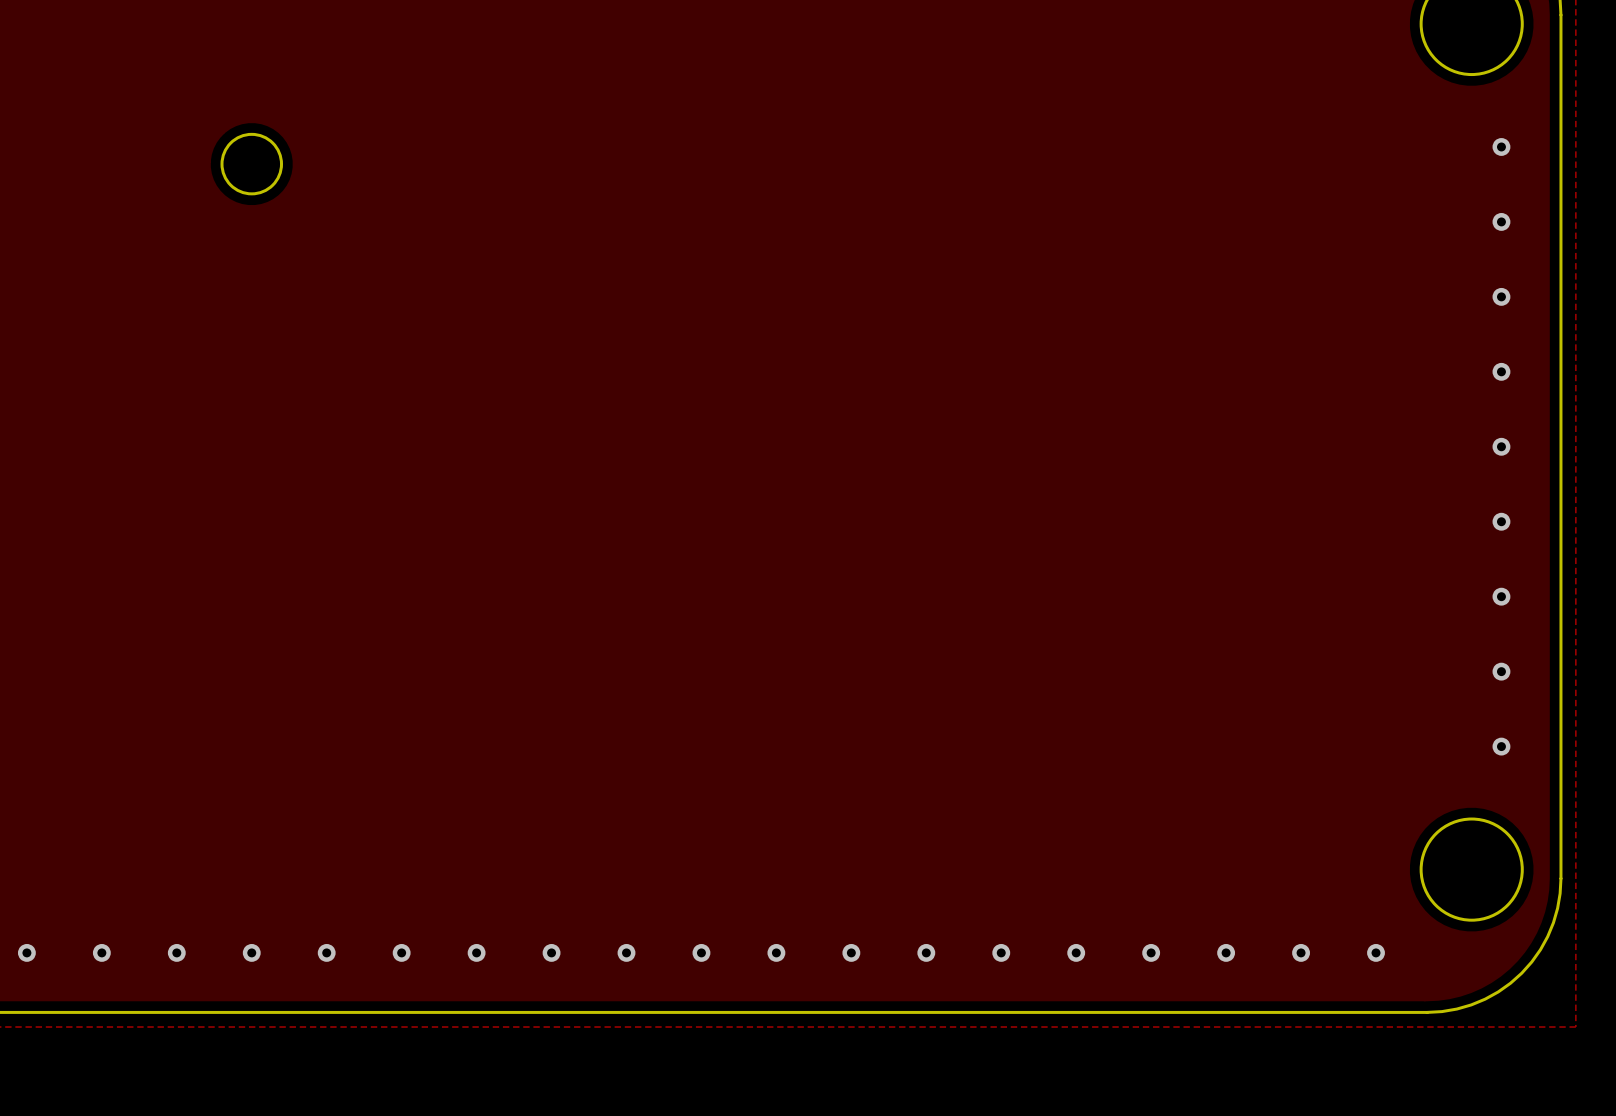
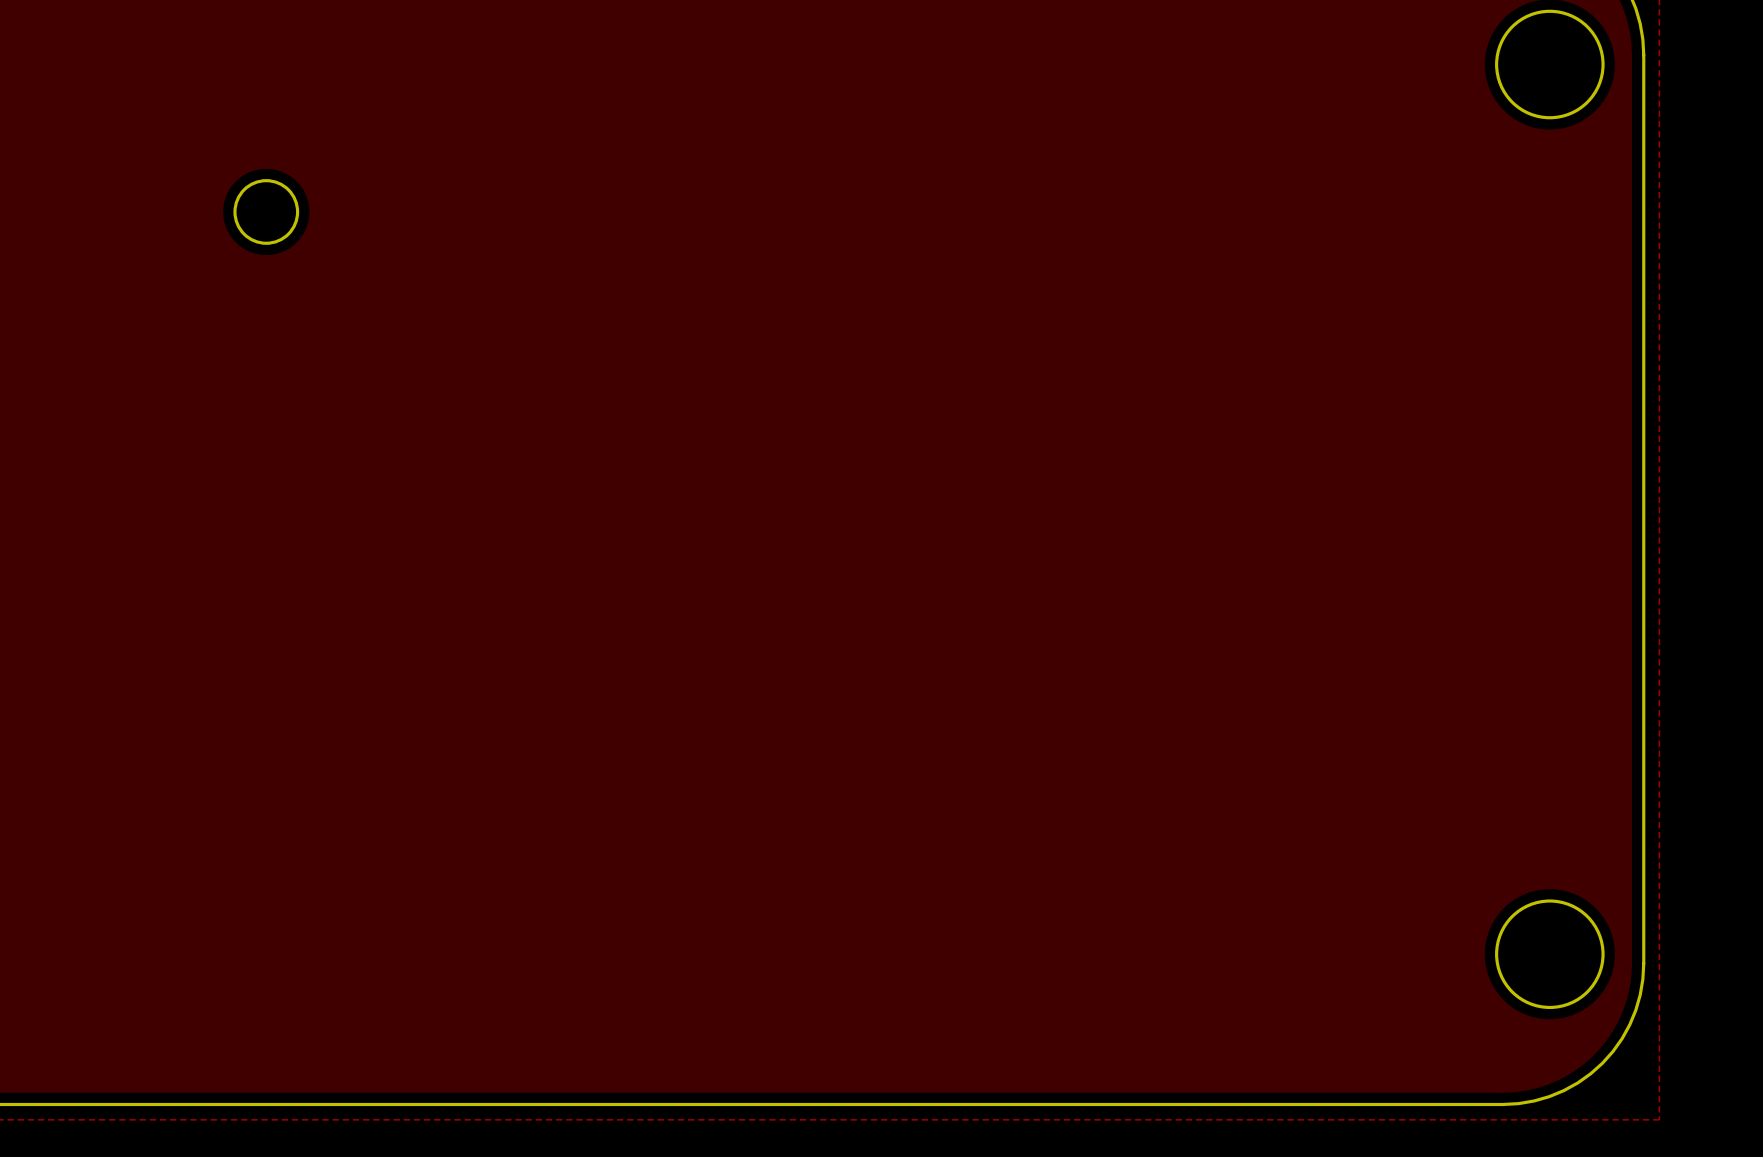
via: (1501, 146) -> none
via: (1501, 221) -> none
via: (1501, 296) -> none
via: (1501, 371) -> none
via: (1501, 446) -> none
via: (1501, 521) -> none
via: (1501, 596) -> none
via: (1501, 671) -> none
via: (1501, 746) -> none
via: (26, 952) -> none
via: (101, 952) -> none
via: (176, 952) -> none
via: (251, 952) -> none
via: (326, 952) -> none
via: (401, 952) -> none
via: (476, 952) -> none
via: (551, 952) -> none
via: (626, 952) -> none
via: (701, 952) -> none
via: (776, 952) -> none
via: (851, 952) -> none
via: (926, 952) -> none
via: (1001, 952) -> none
via: (1076, 952) -> none
via: (1151, 952) -> none
via: (1226, 952) -> none
via: (1301, 952) -> none
via: (1376, 952) -> none

